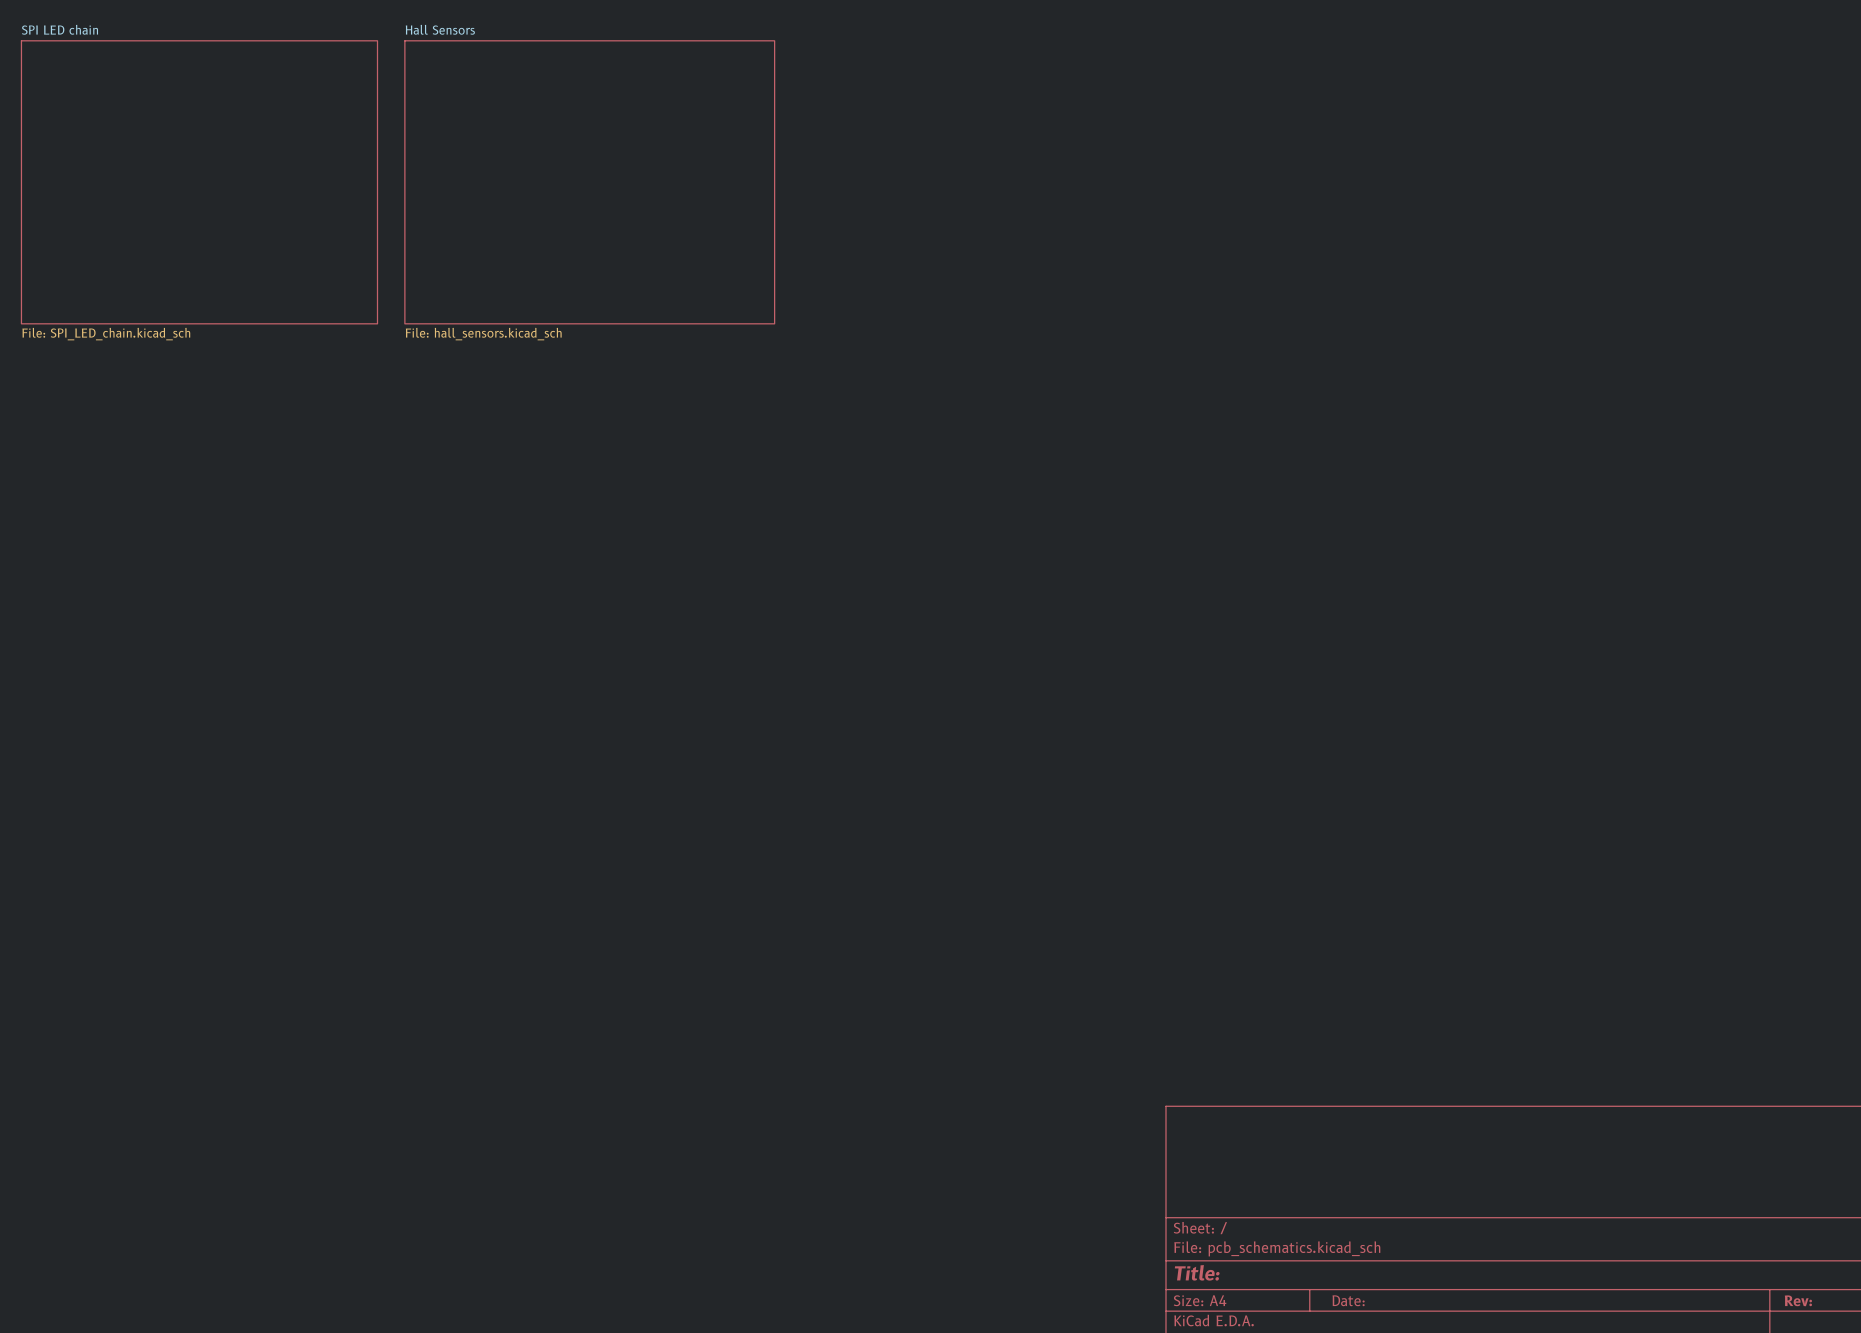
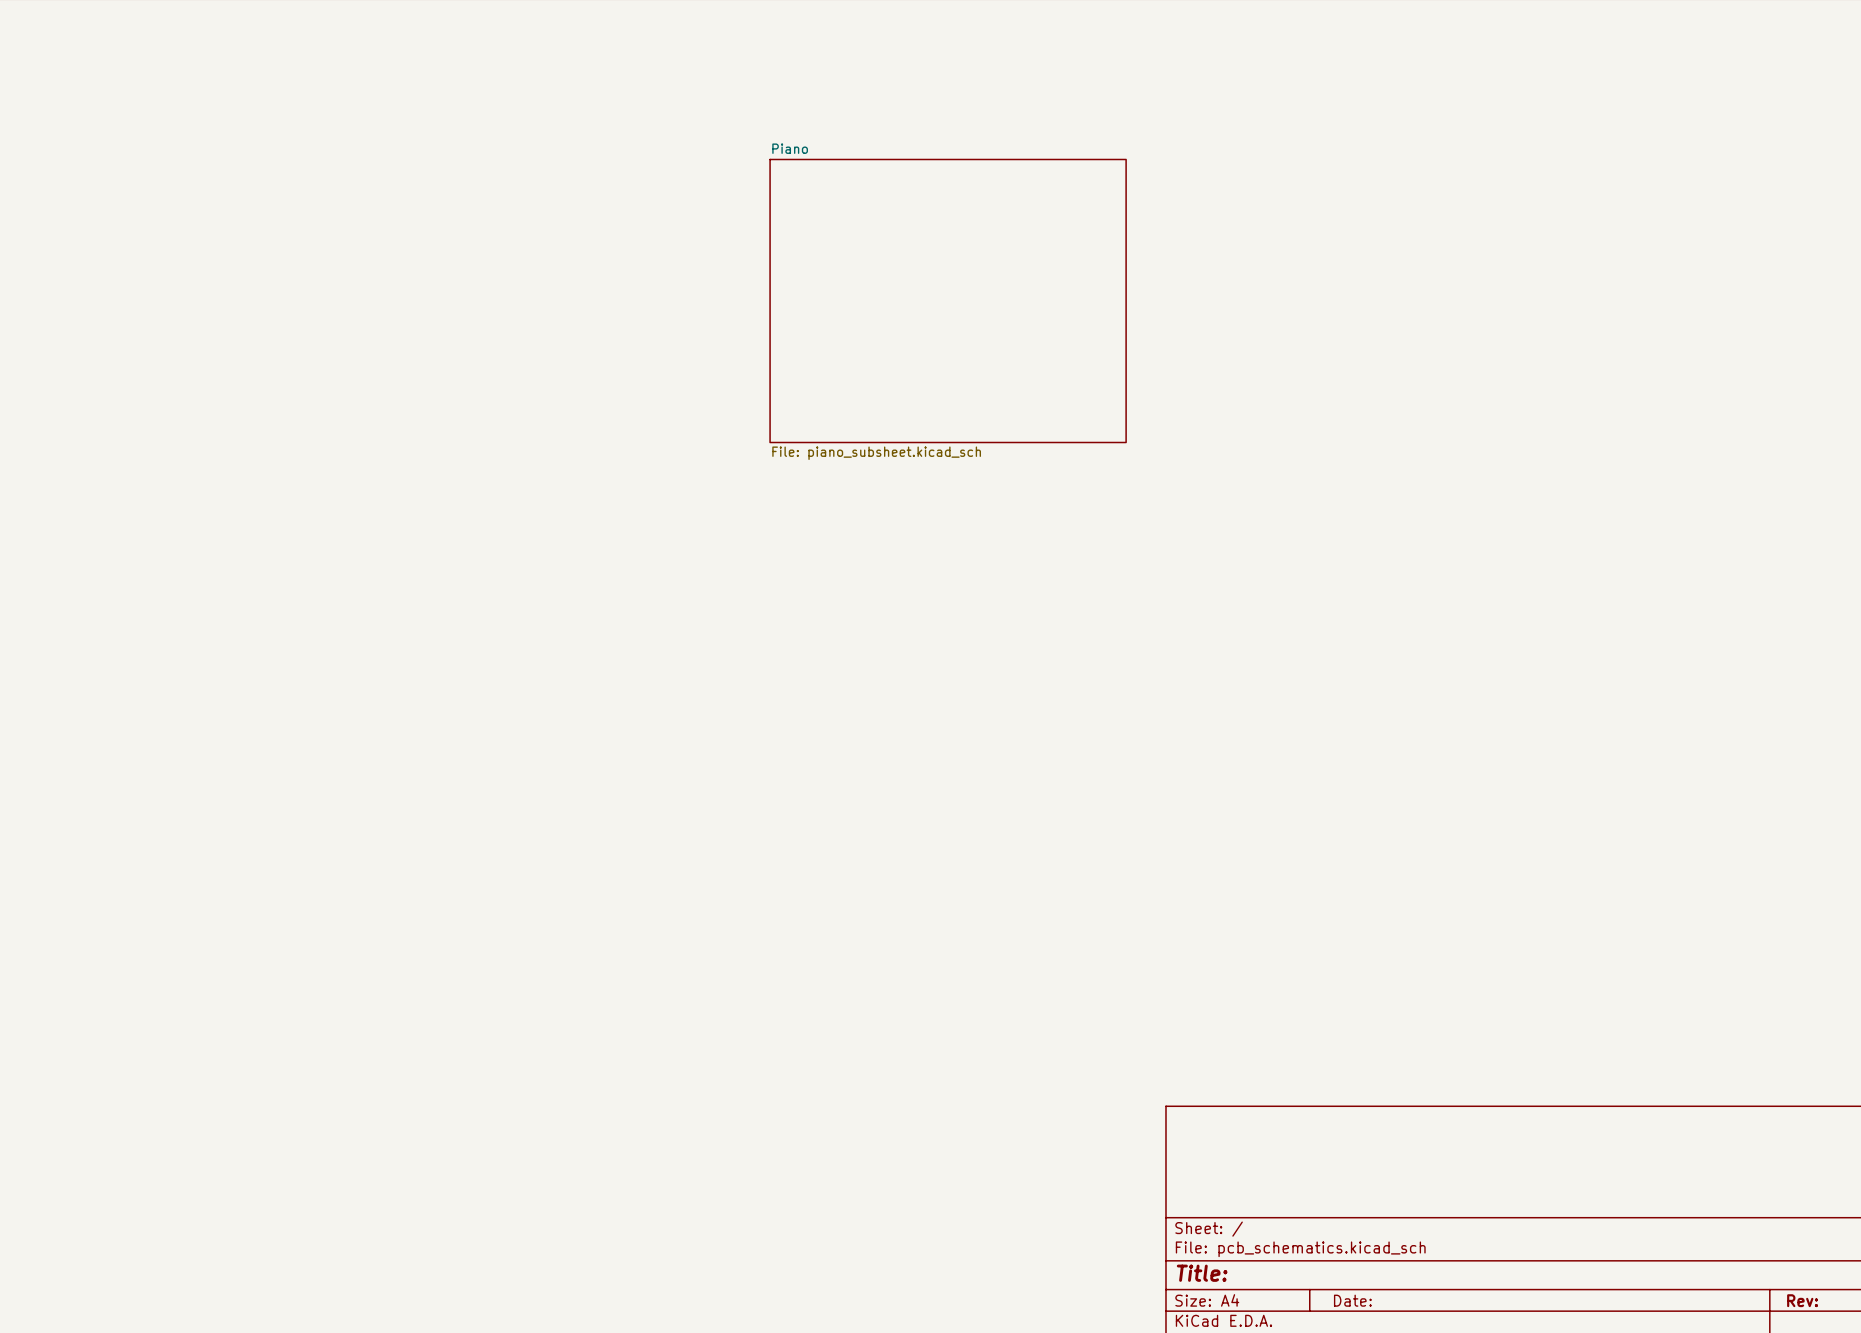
sheet SPI LED chain: File: SPI_LED_chain.kicad_sch (199, 182) -> none
sheet Hall Sensors: File: hall_sensors.kicad_sch (589, 182) -> none
sheet Piano: none -> File: piano_subsheet.kicad_sch (948, 301)

